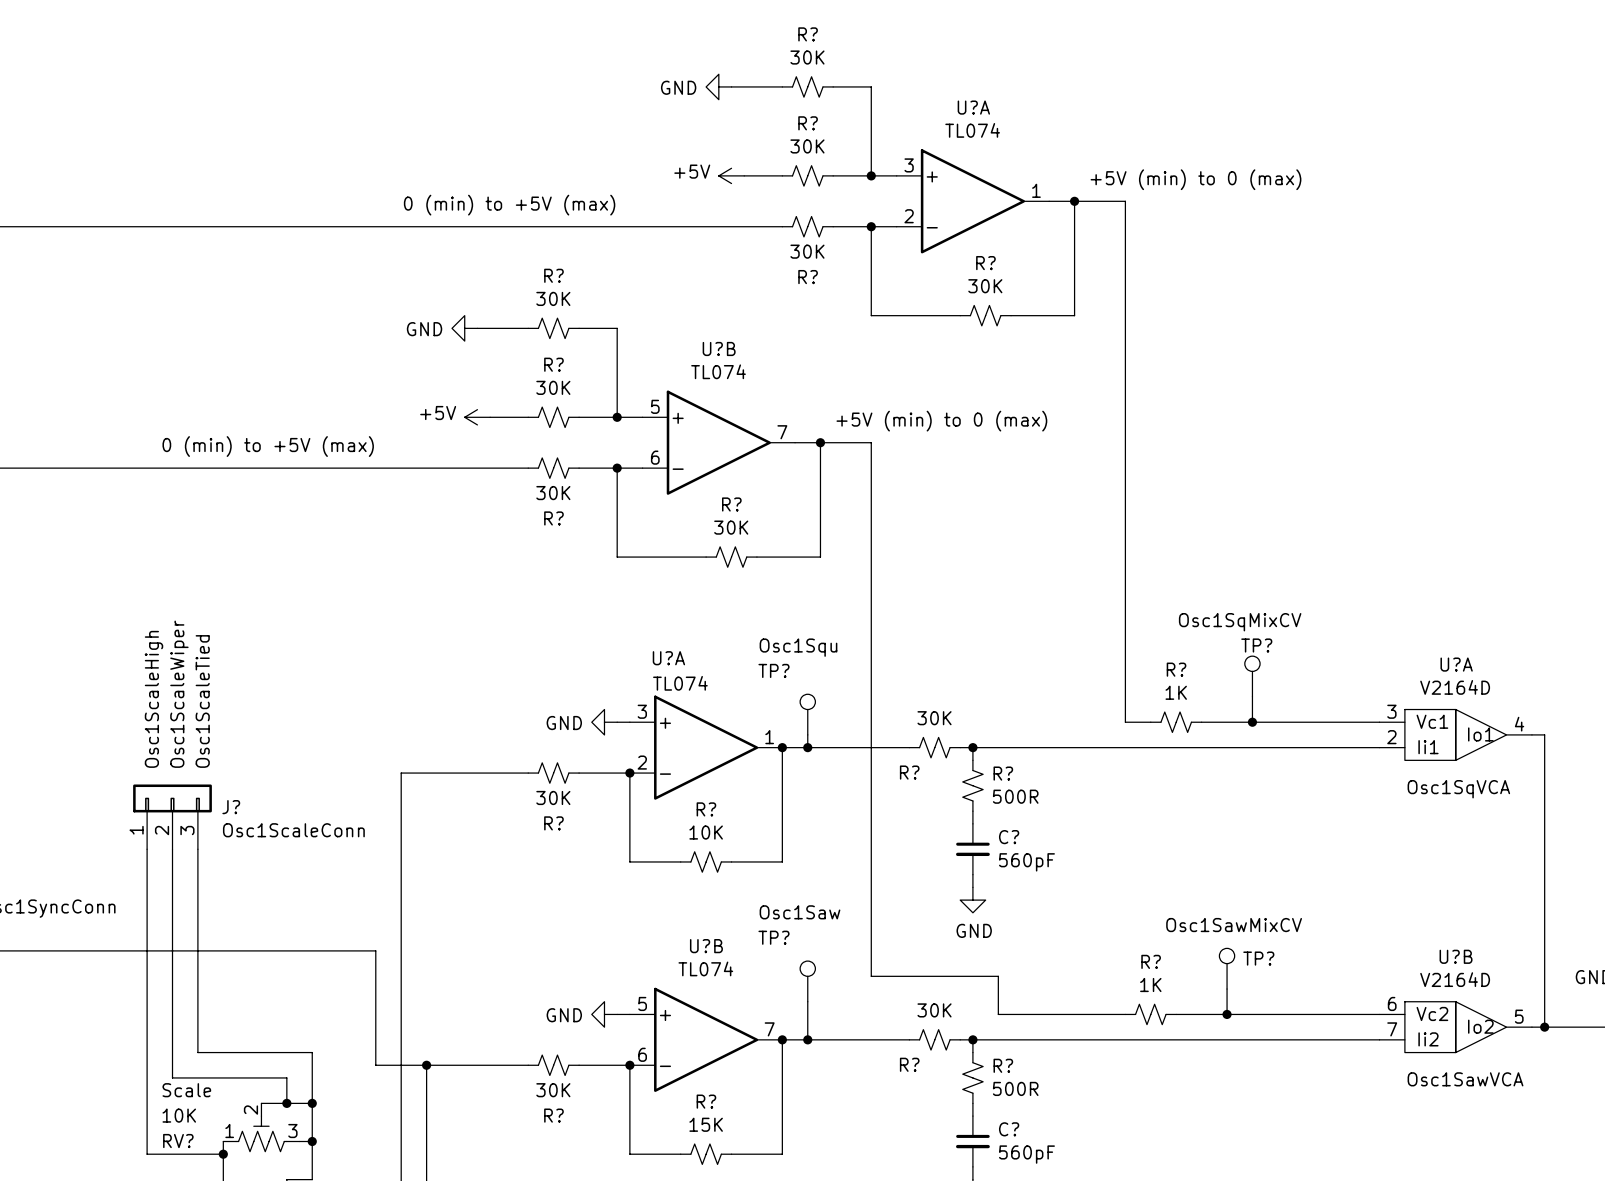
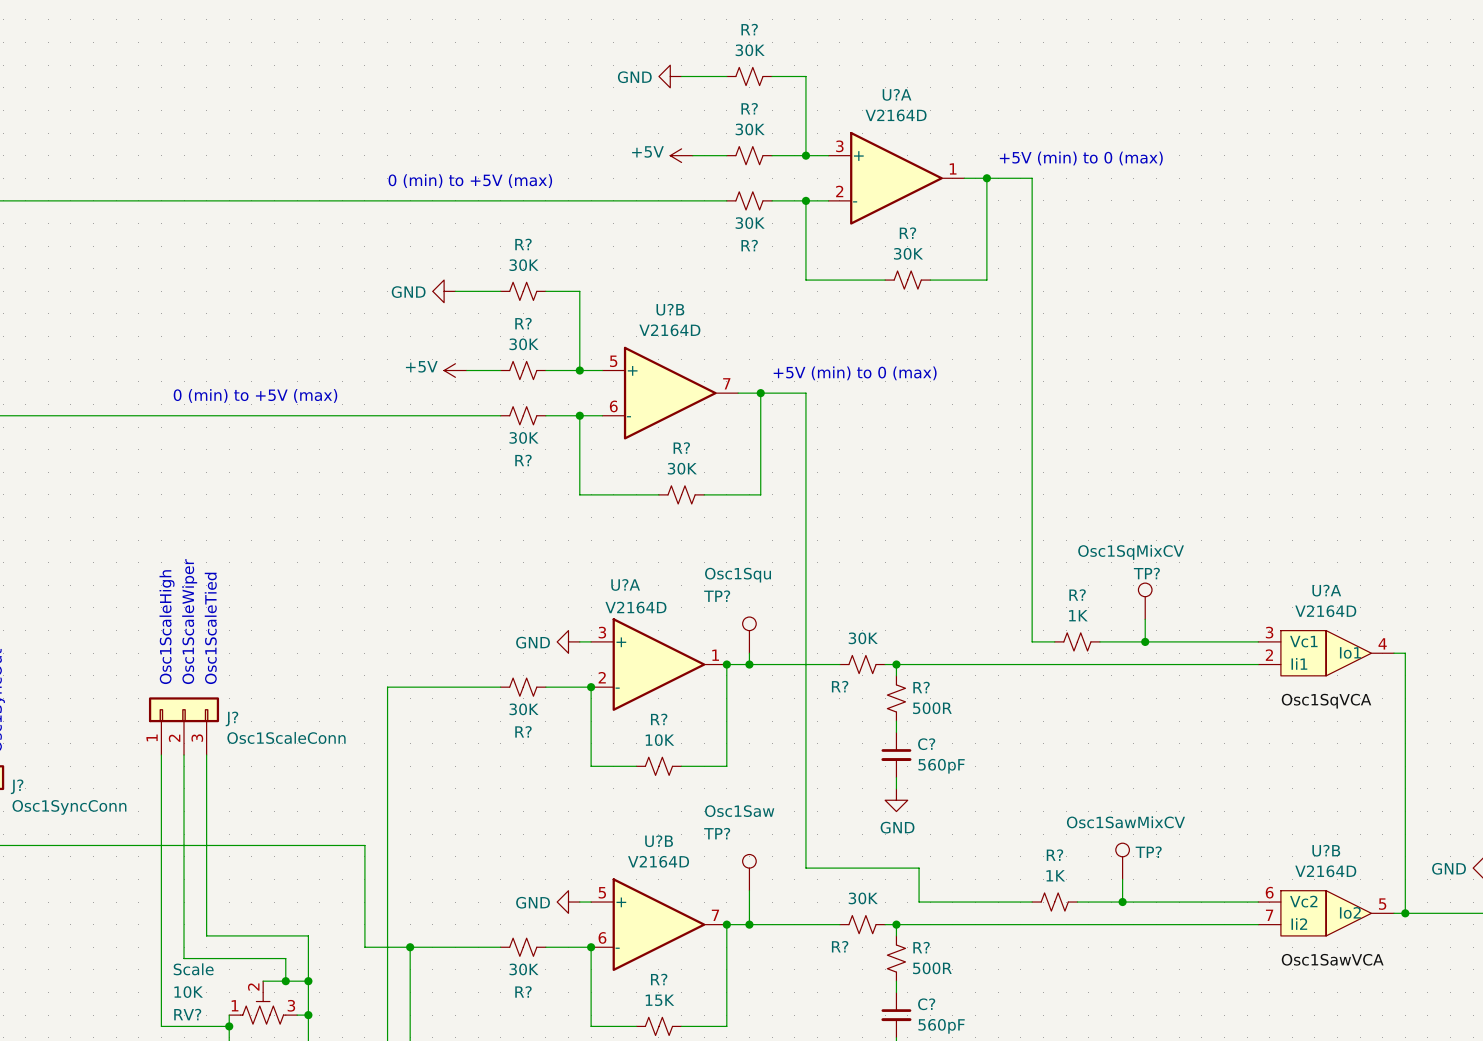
U?A value: TL074 (972, 130) -> V2164D (896, 115)
U?B value: TL074 (718, 371) -> V2164D (669, 330)
U?A value: TL074 (680, 683) -> V2164D (635, 607)
U?B value: TL074 (705, 968) -> V2164D (658, 861)

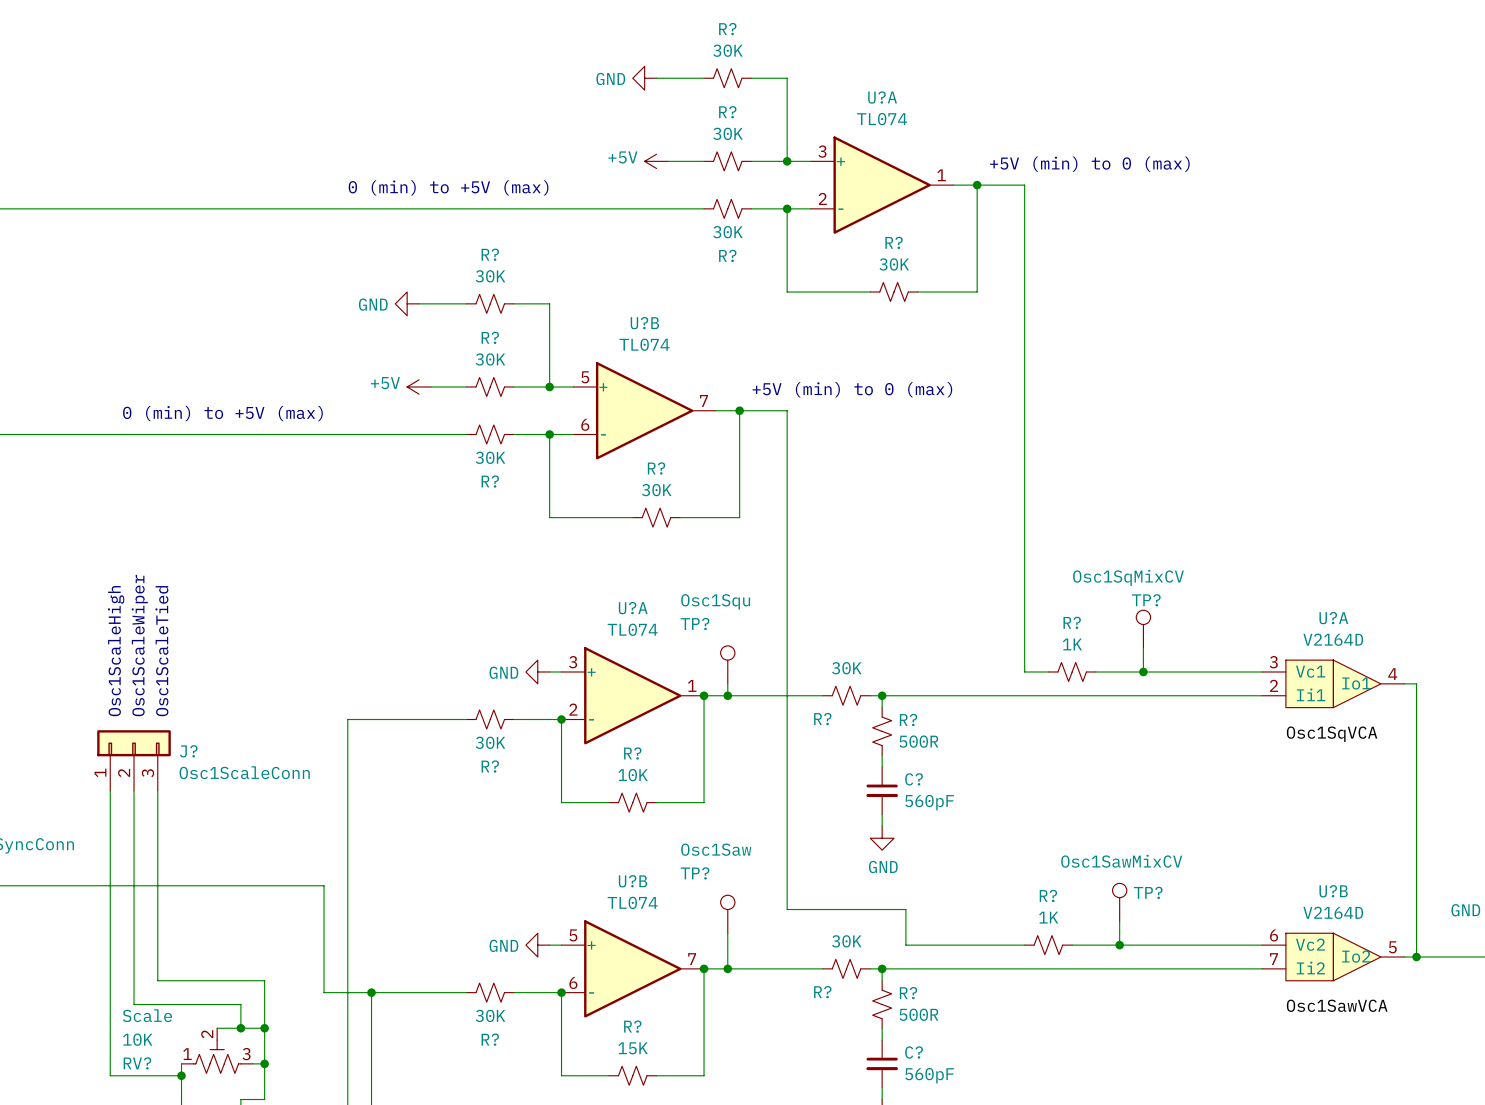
U?A value: V2164D (896, 115) -> TL074 (882, 119)
U?B value: V2164D (669, 330) -> TL074 (644, 344)
U?A name position: U?A (625, 584) -> U?A (633, 608)
U?A value: V2164D (635, 607) -> TL074 (632, 629)
U?B value: V2164D (658, 861) -> TL074 (632, 902)

